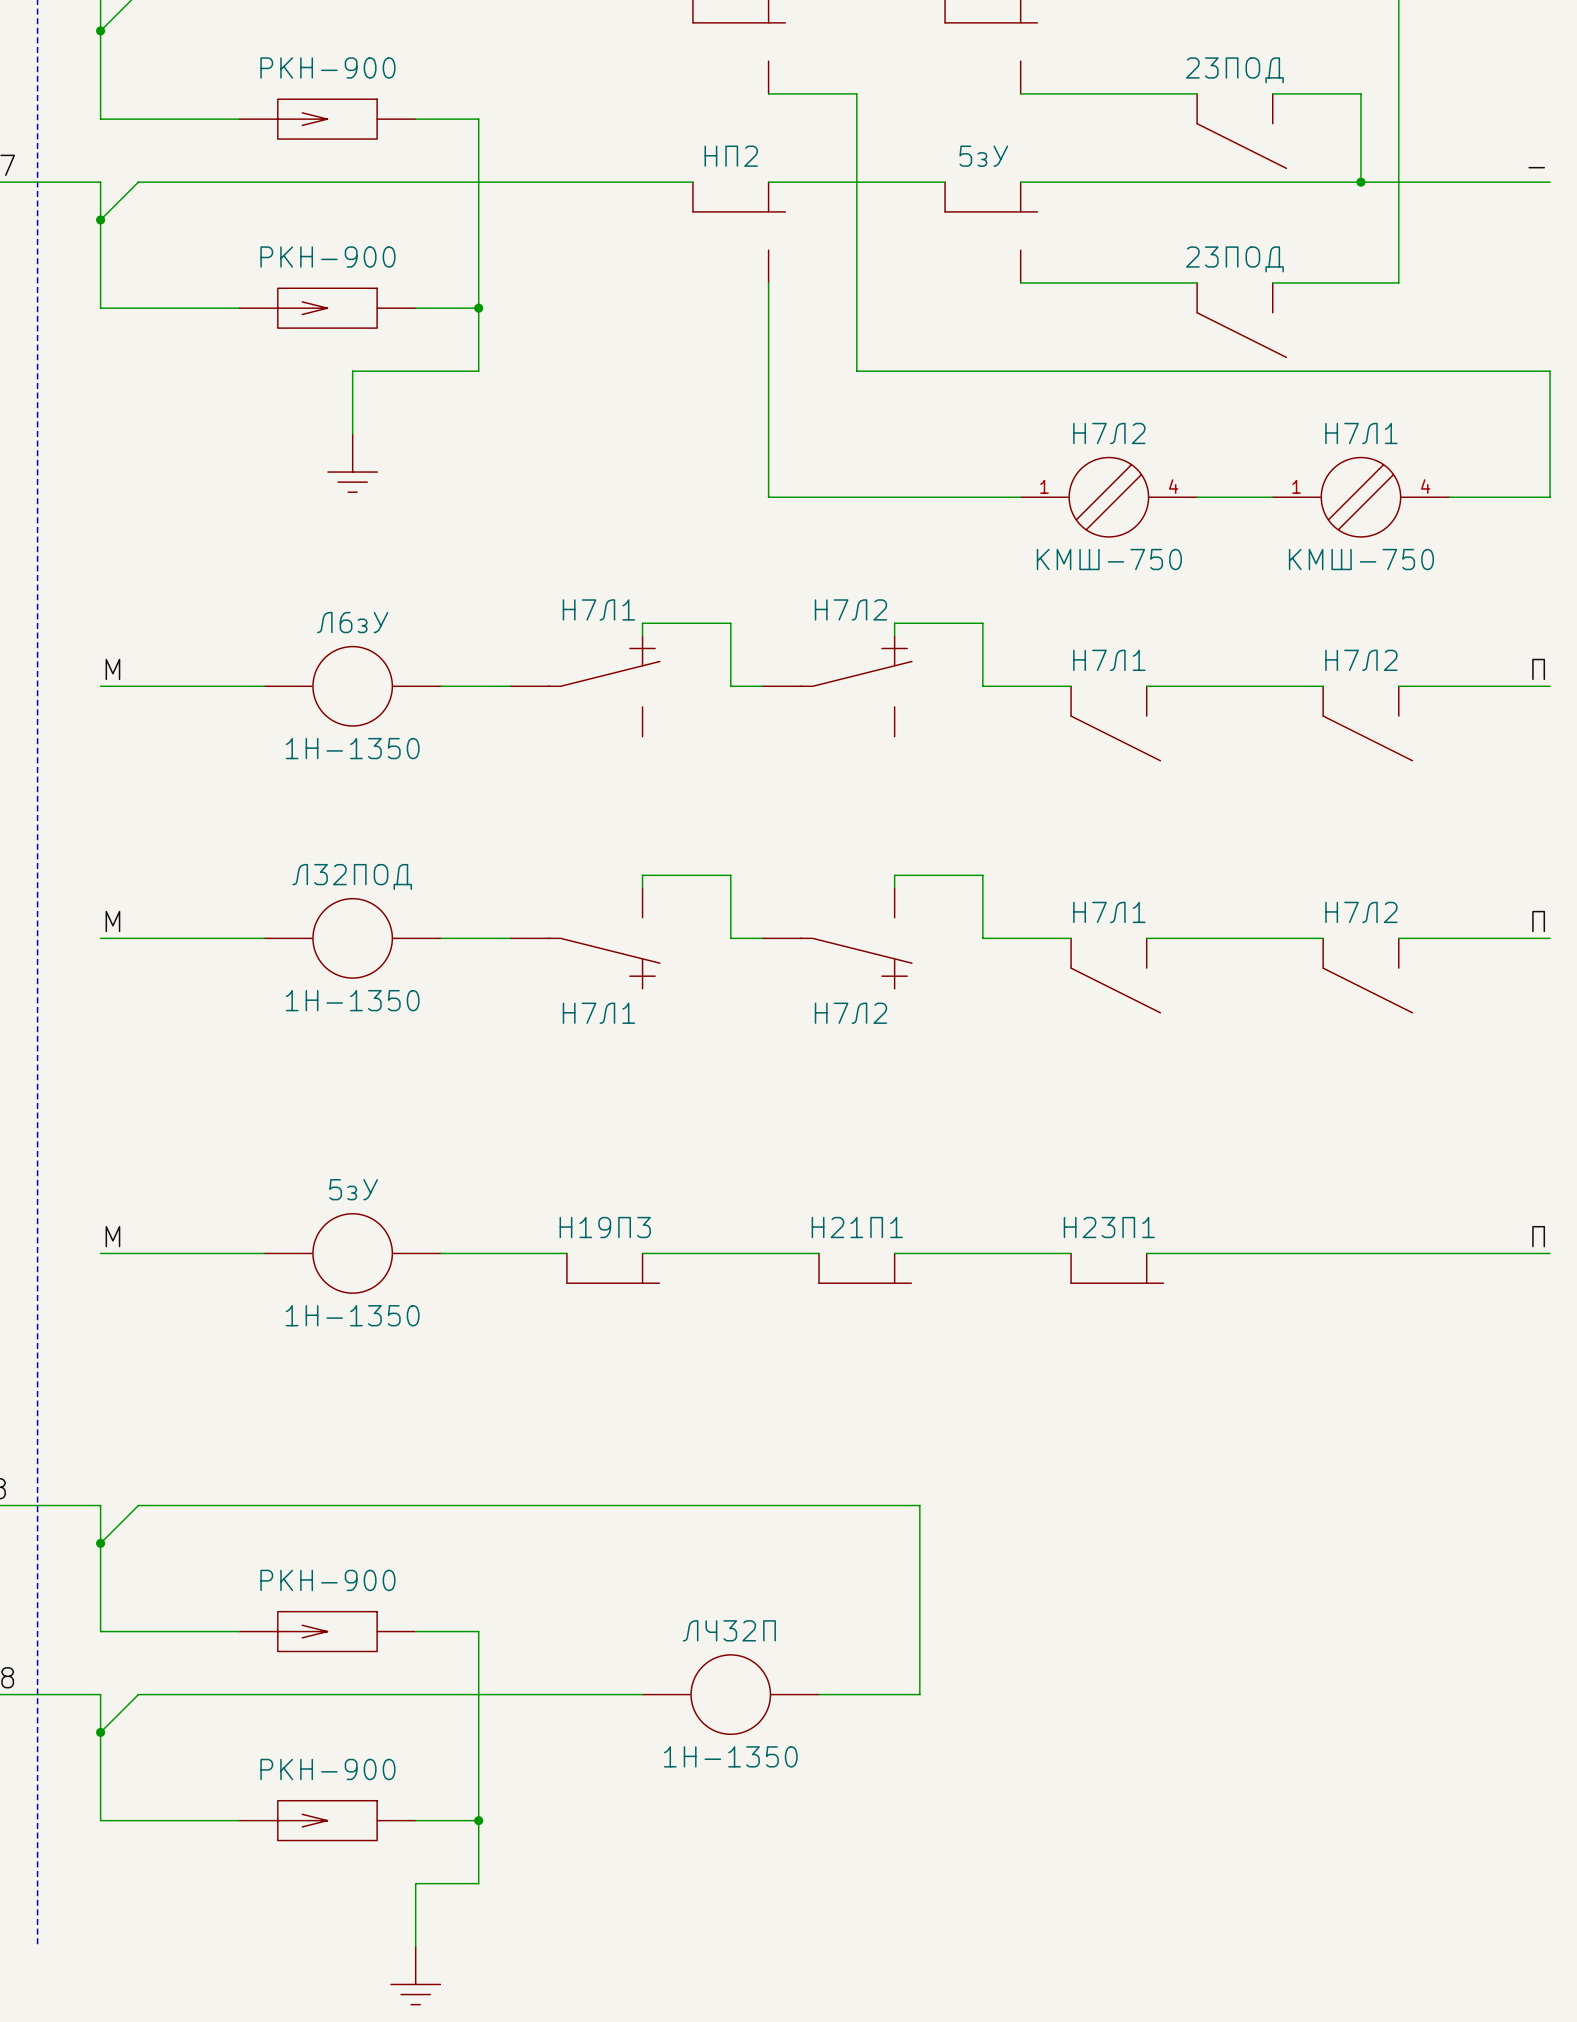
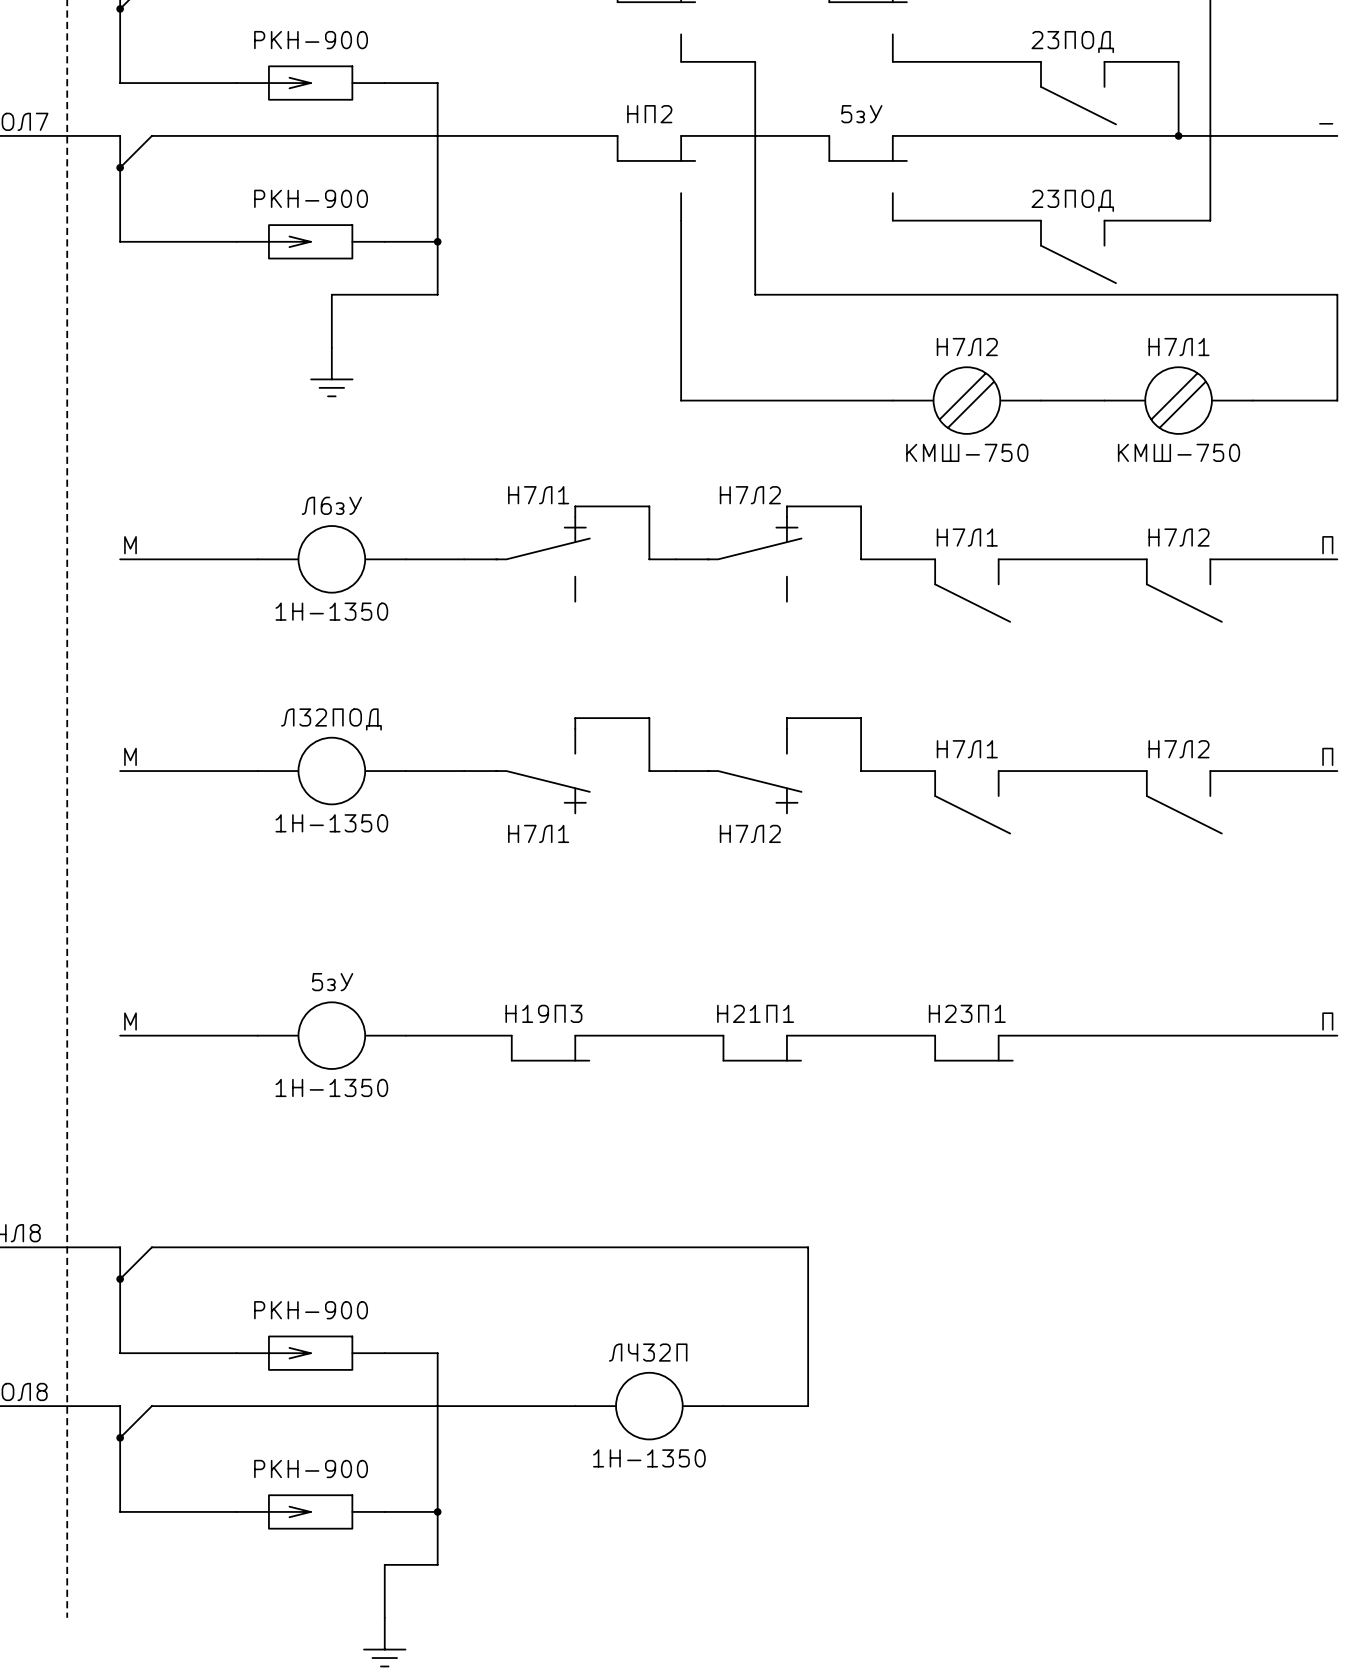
part pin number: 1 (1044, 486) -> none
part pin number: 4 (1173, 486) -> none
part pin number: 1 (1296, 486) -> none
part pin number: 4 (1425, 486) -> none

